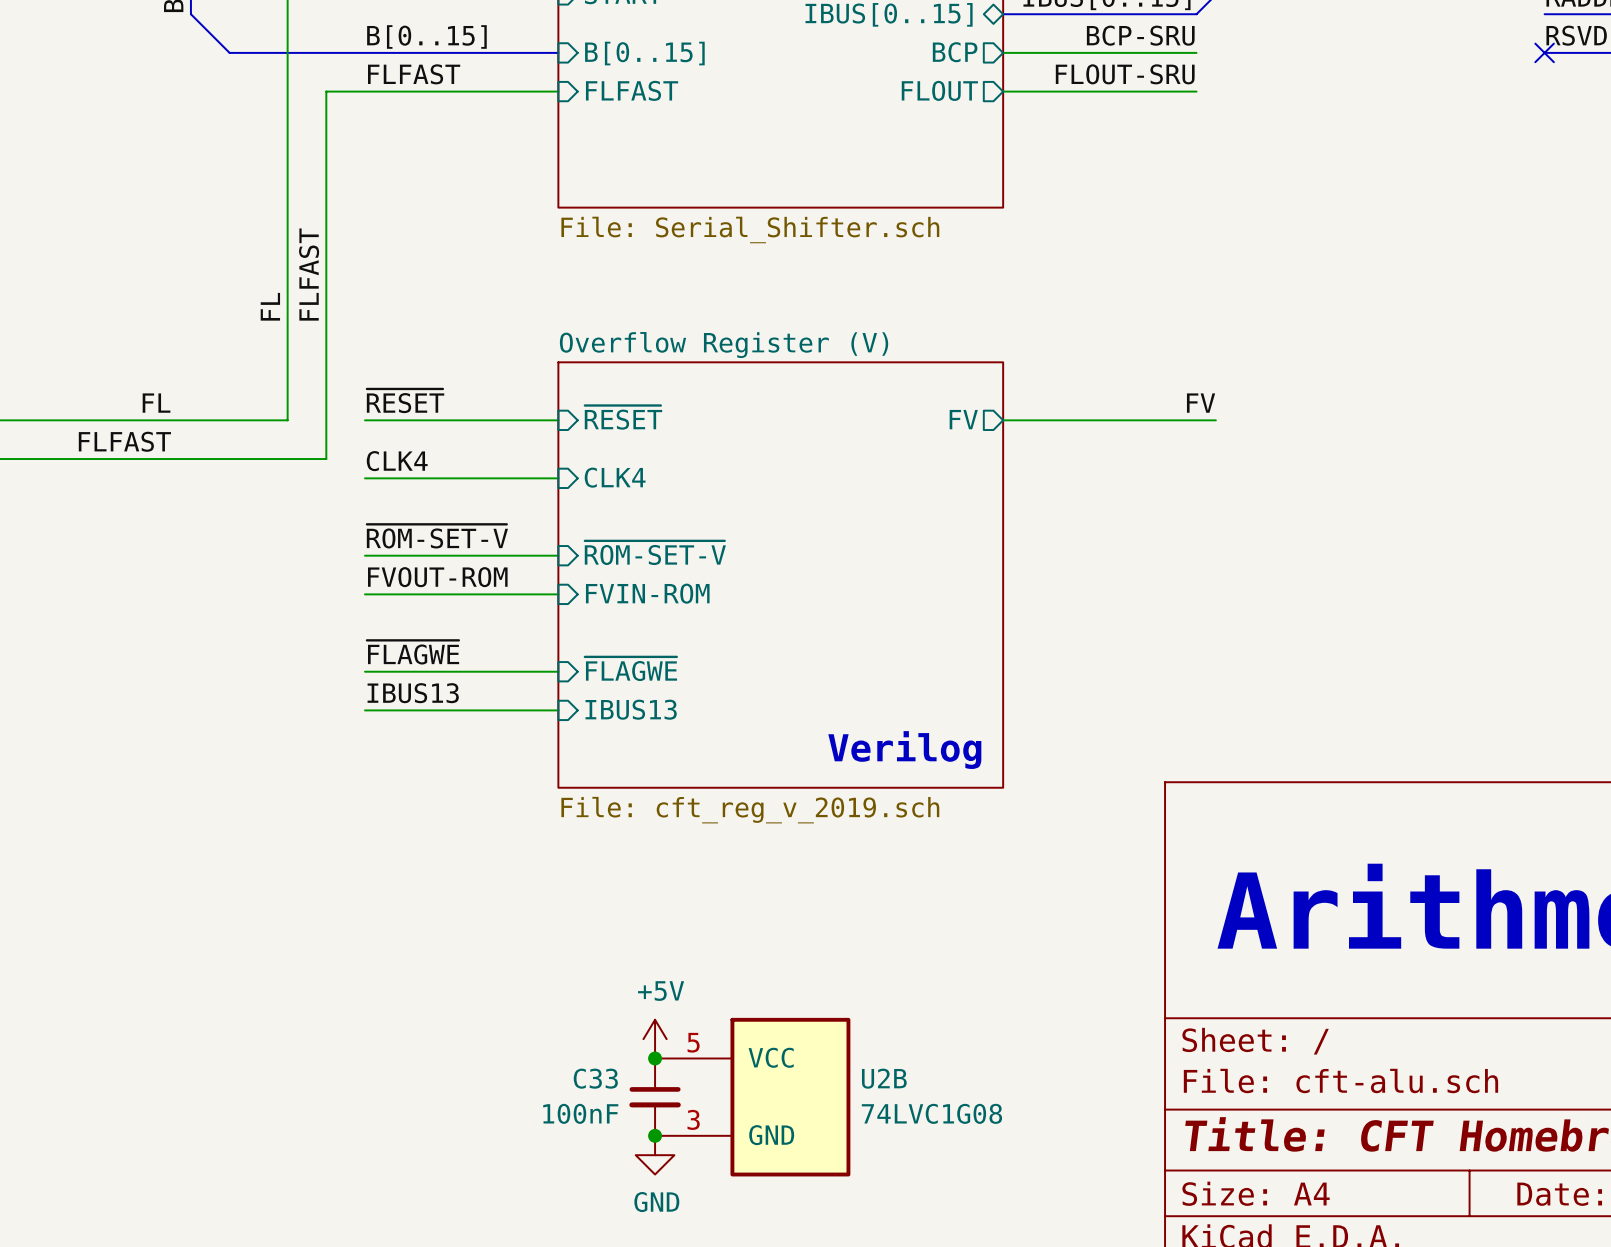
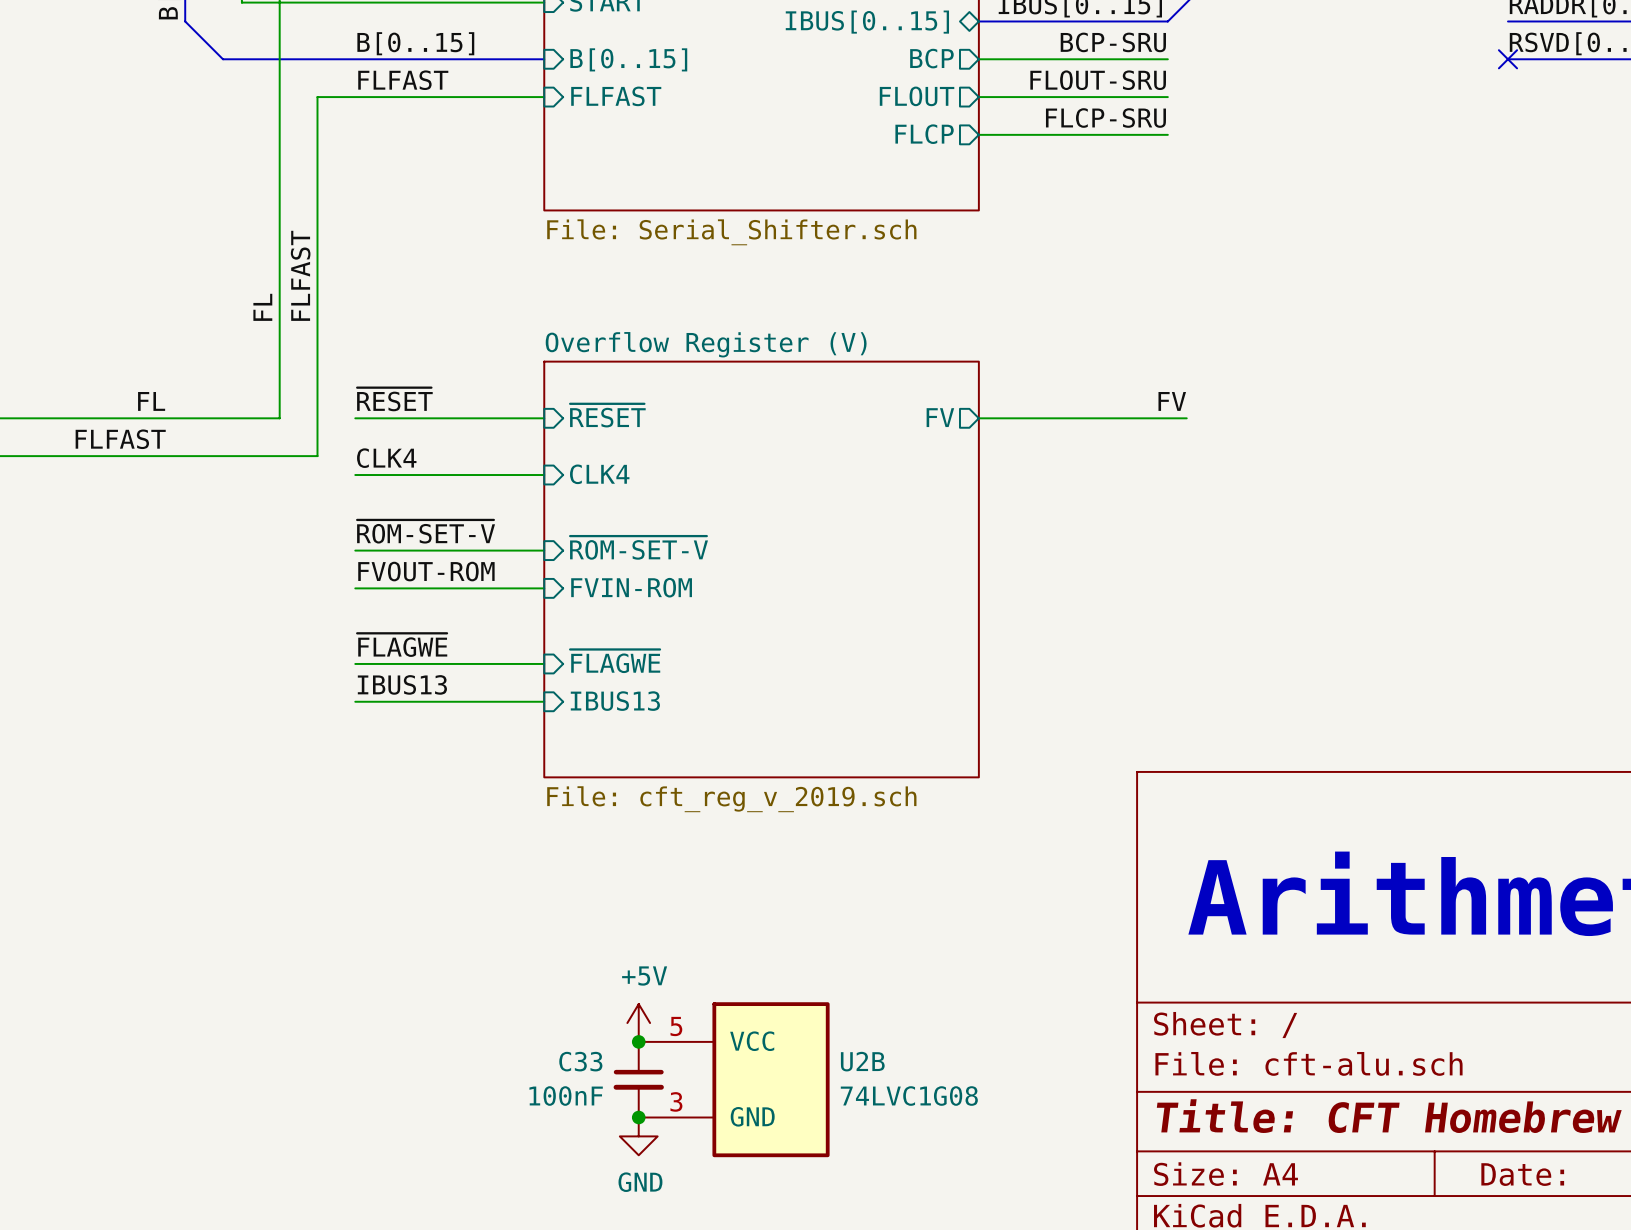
label: none -> FLCP-SRU (1105, 118)
sheet pin: none -> FLCP (924, 134)
wire: none -> (978, 134) (1167, 134)
text: Verilog (904, 750) -> none

